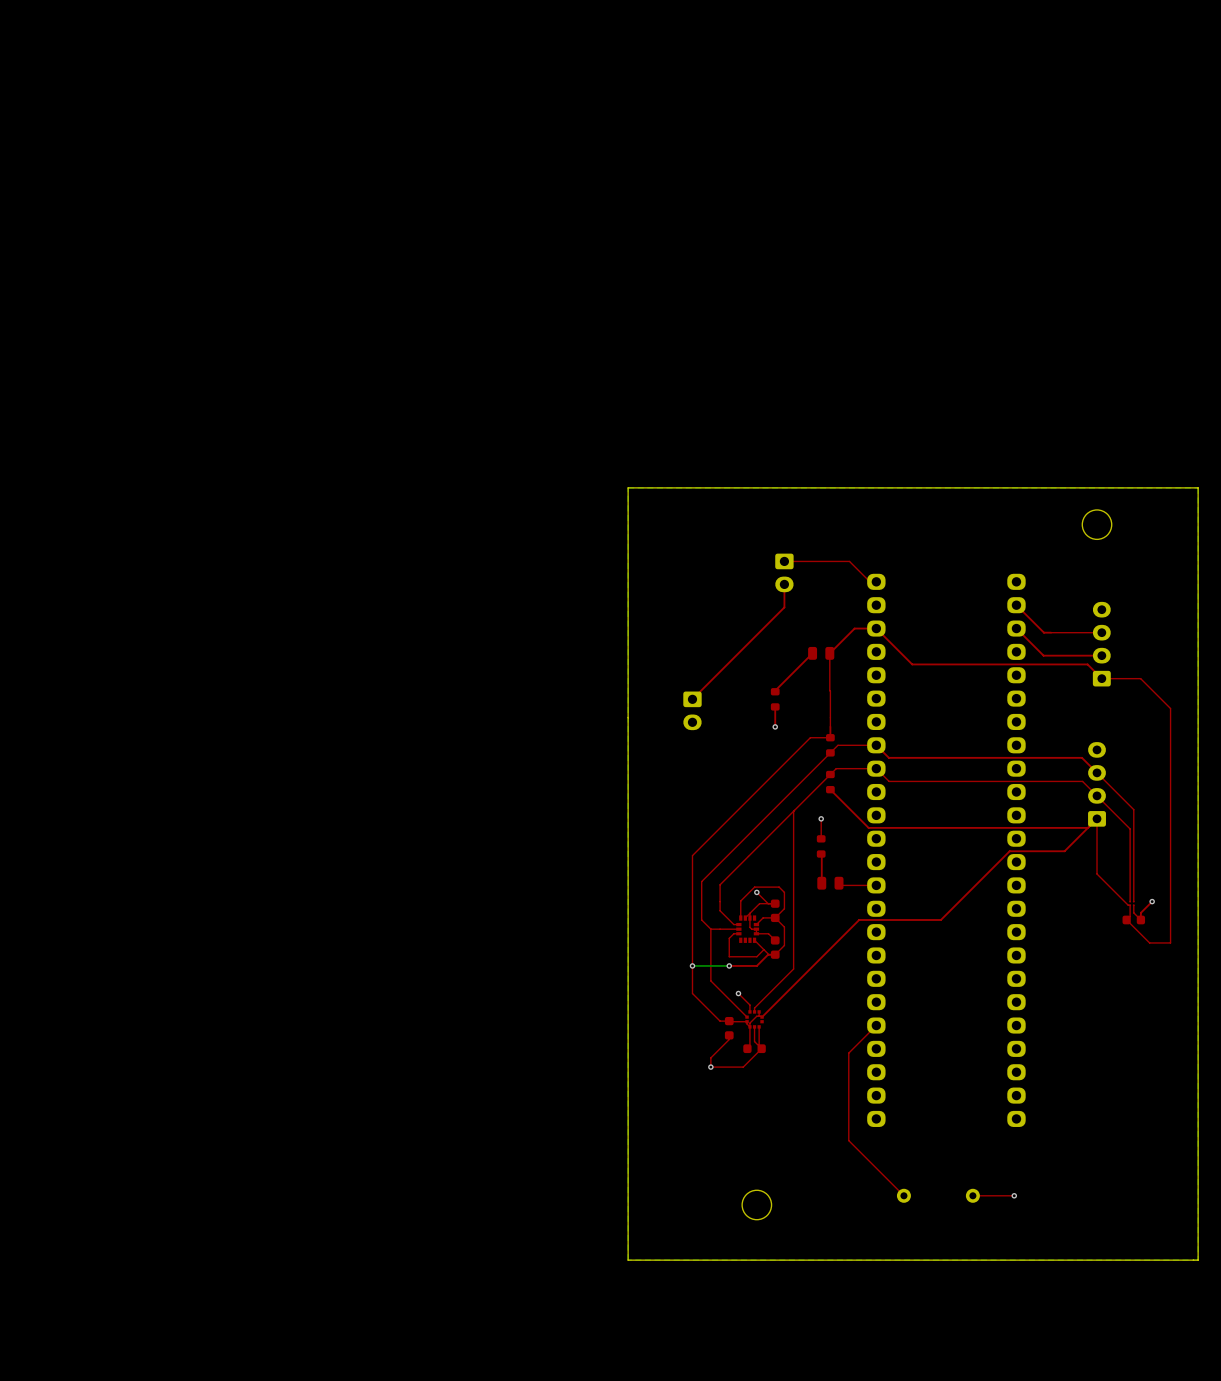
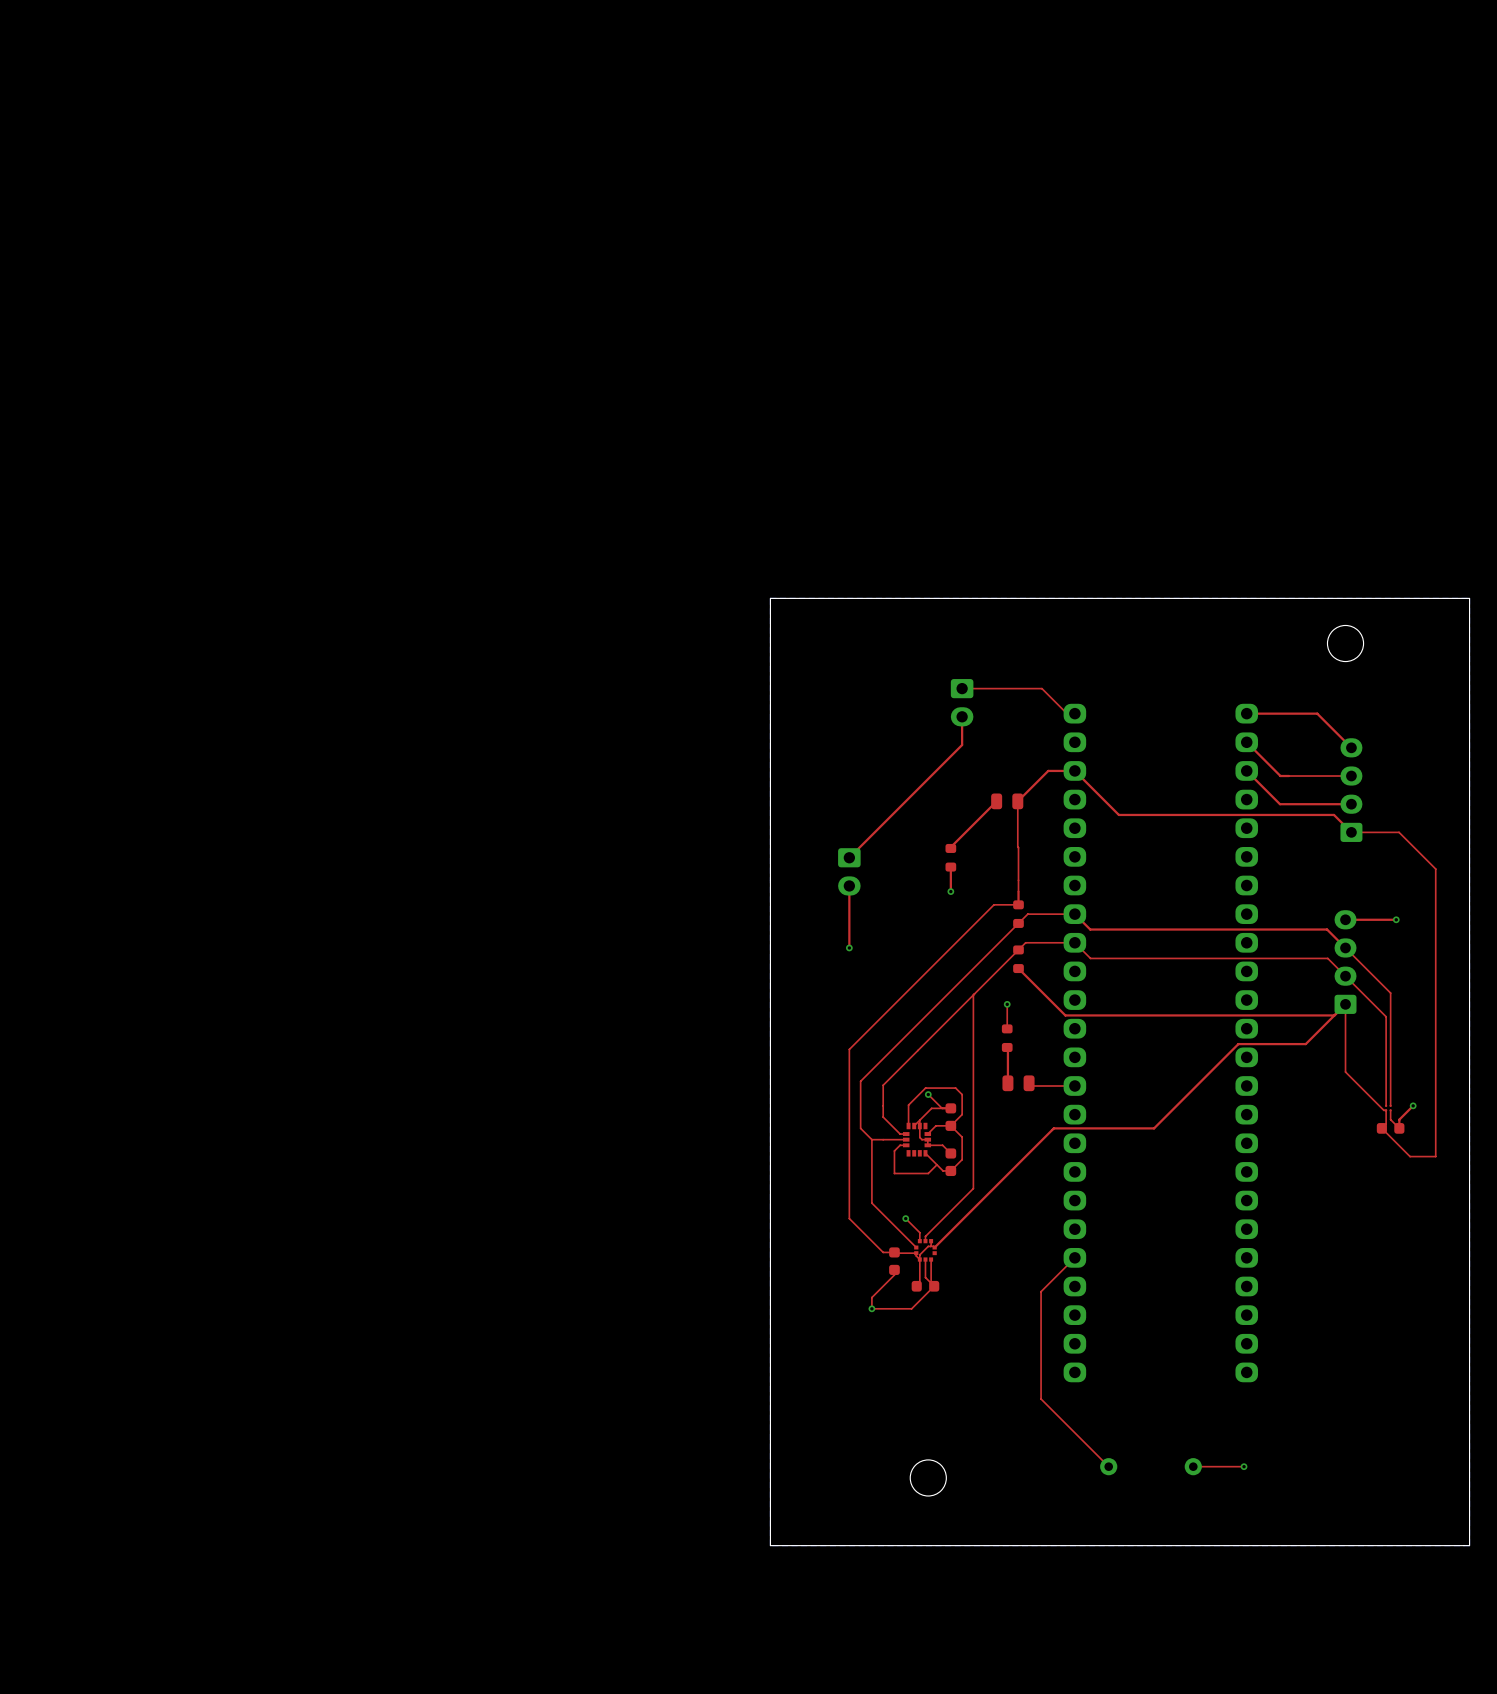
top track: none -> (1246, 713) (1317, 713) (1351, 747)
top track: none -> (849, 885) (849, 947)
top track: none -> (1396, 919) (1345, 919)
via: none -> (1396, 919)
via: none -> (849, 947)
top track: (775, 956) (775, 954) (768, 954) (756, 965) (729, 965) -> none
via: (692, 965) -> none
bottom track: (729, 965) (692, 965) -> none
via: (729, 965) -> none

